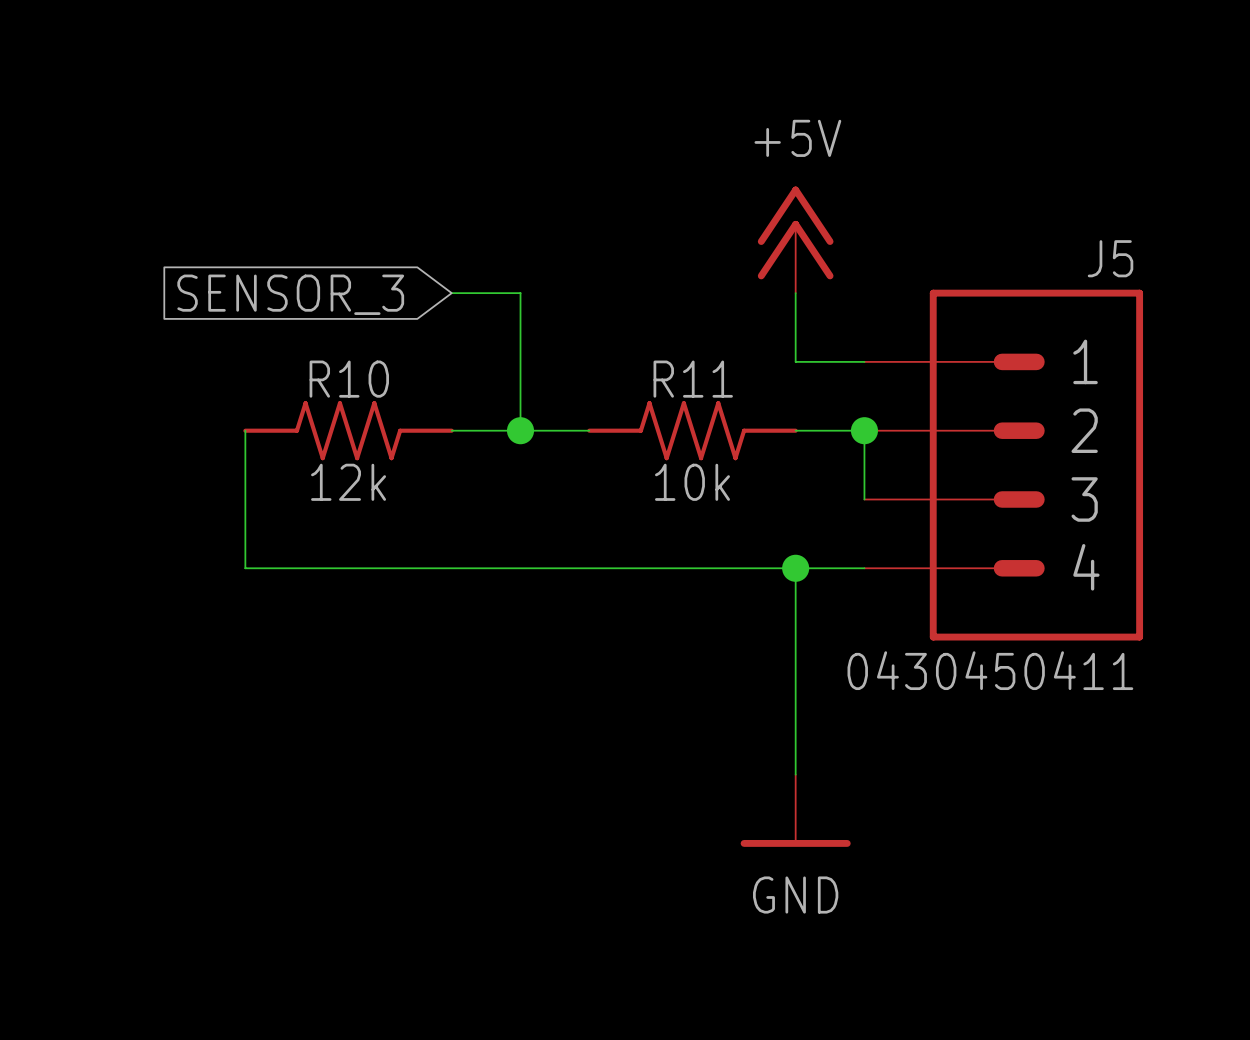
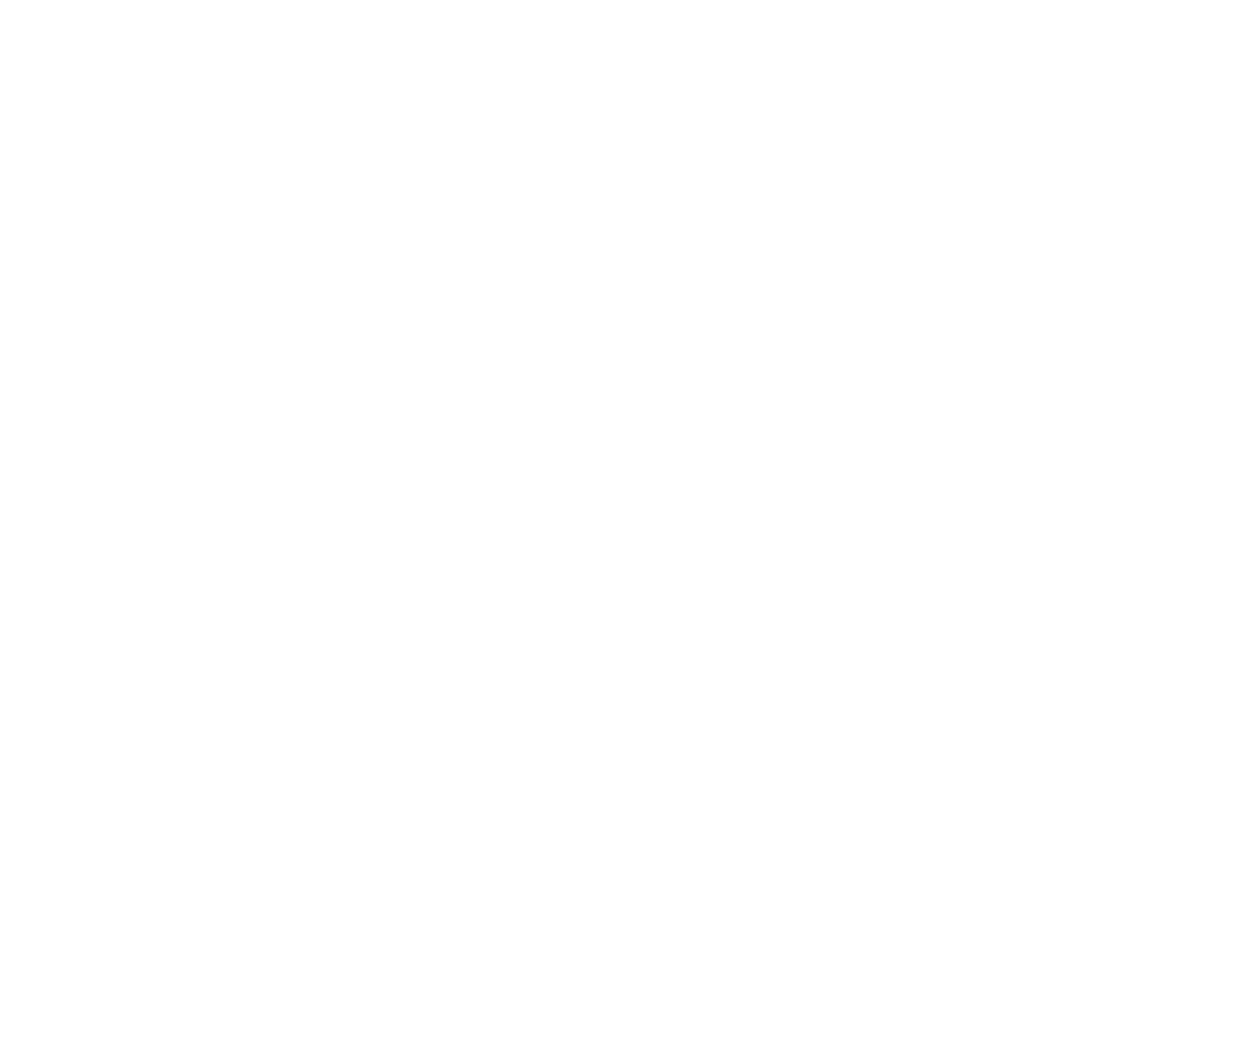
power symbol: +5V (795, 239) -> none
wire: (451, 293) (520, 293) (520, 430) -> none
wire: (795, 293) (795, 361) (864, 361) -> none
global label: SENSOR_3 (290, 294) -> none
wire: (245, 430) (245, 568) (864, 568) -> none
R10: (348, 430) -> none
wire: (451, 430) (589, 430) -> none
junction: (520, 430) -> none
R11: (692, 430) -> none
wire: (795, 430) (864, 430) (864, 499) -> none
junction: (864, 430) -> none
J5: (1003, 465) -> none
wire: (795, 568) (795, 774) -> none
junction: (795, 568) -> none
power symbol: GND (795, 810) -> none

